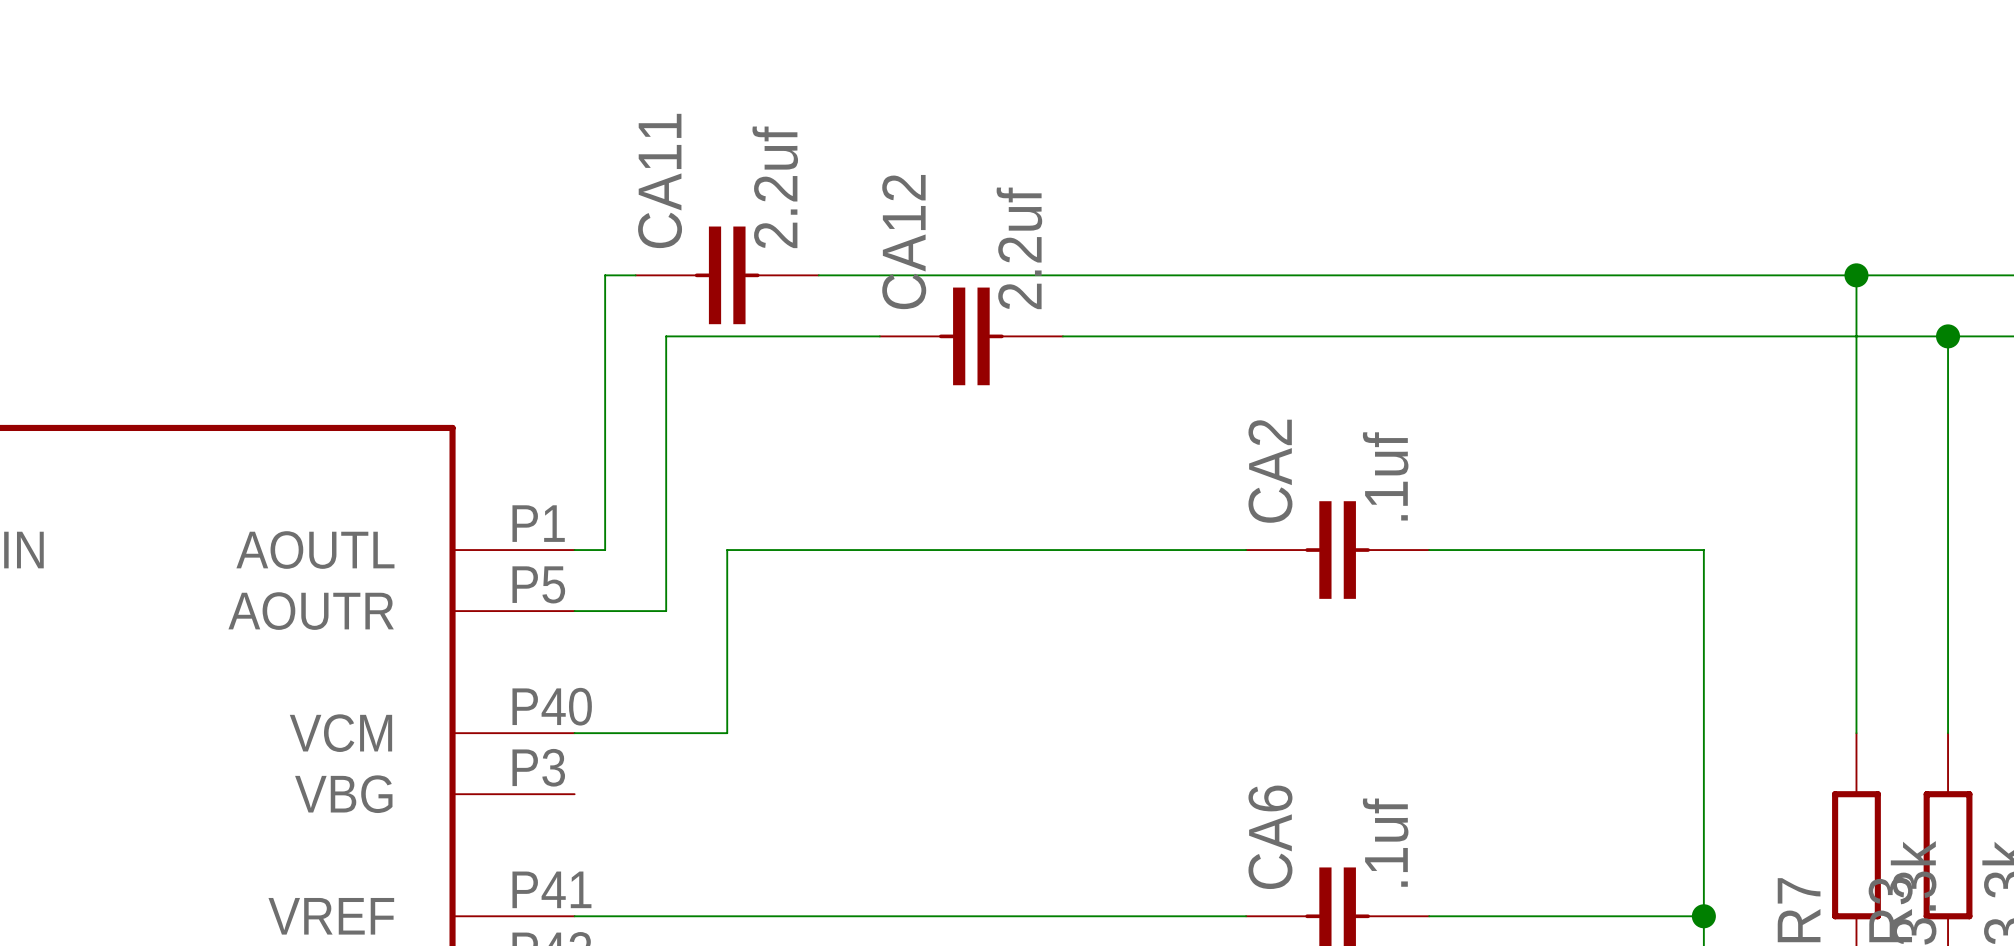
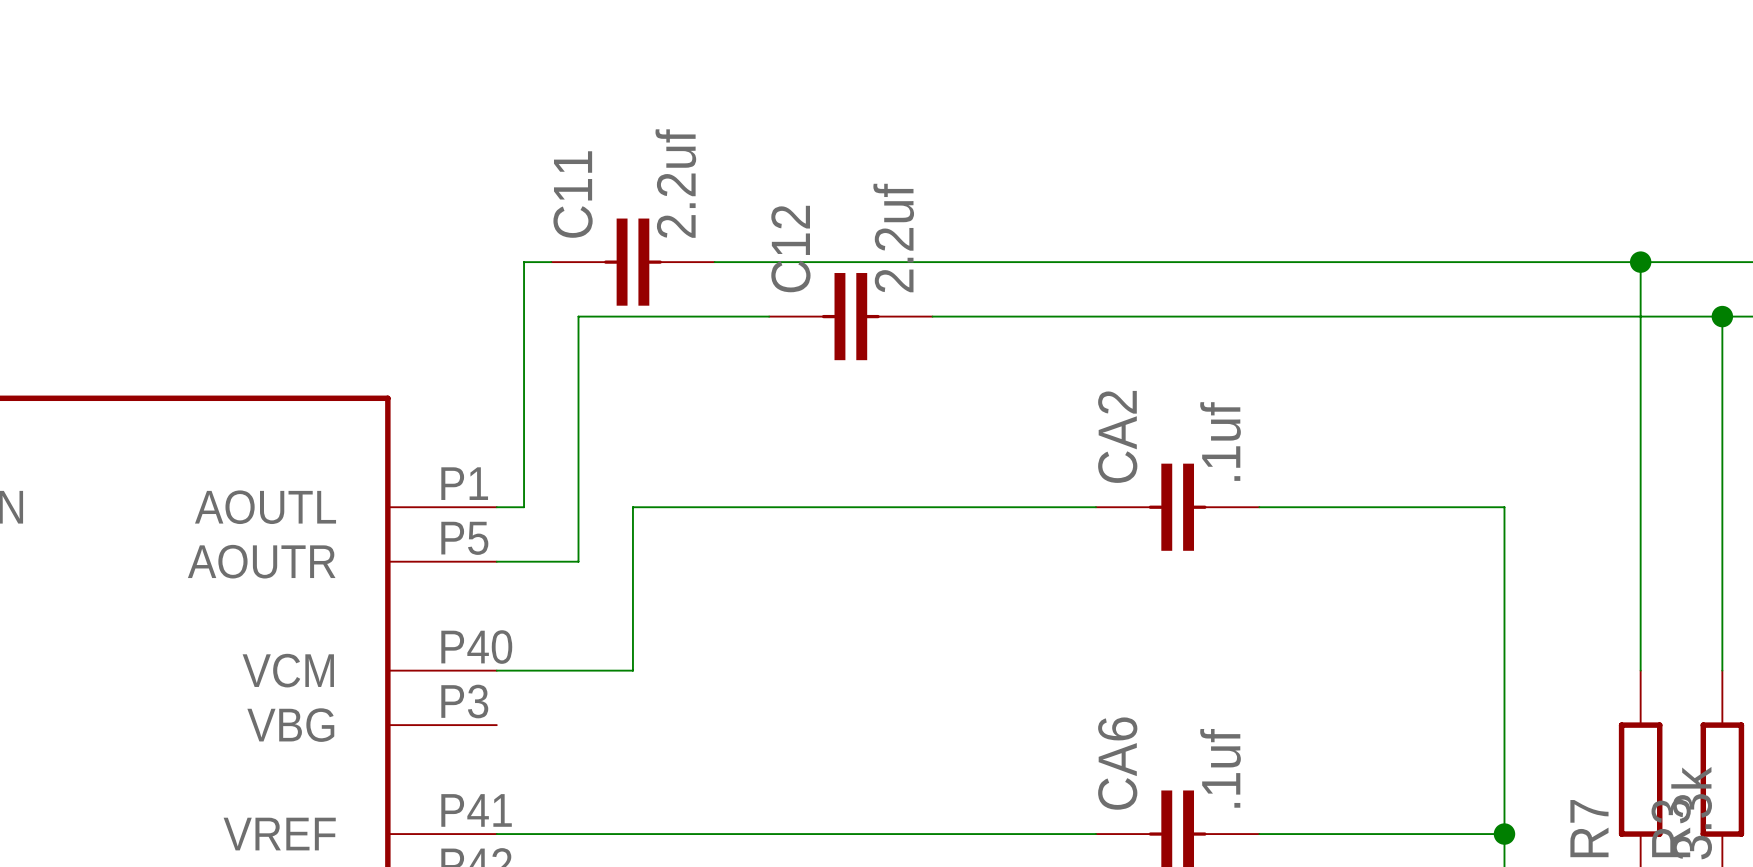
CA11 name: CA11 (660, 180) -> C11 (573, 194)
CA12 name: CA12 (904, 242) -> C12 (790, 249)

